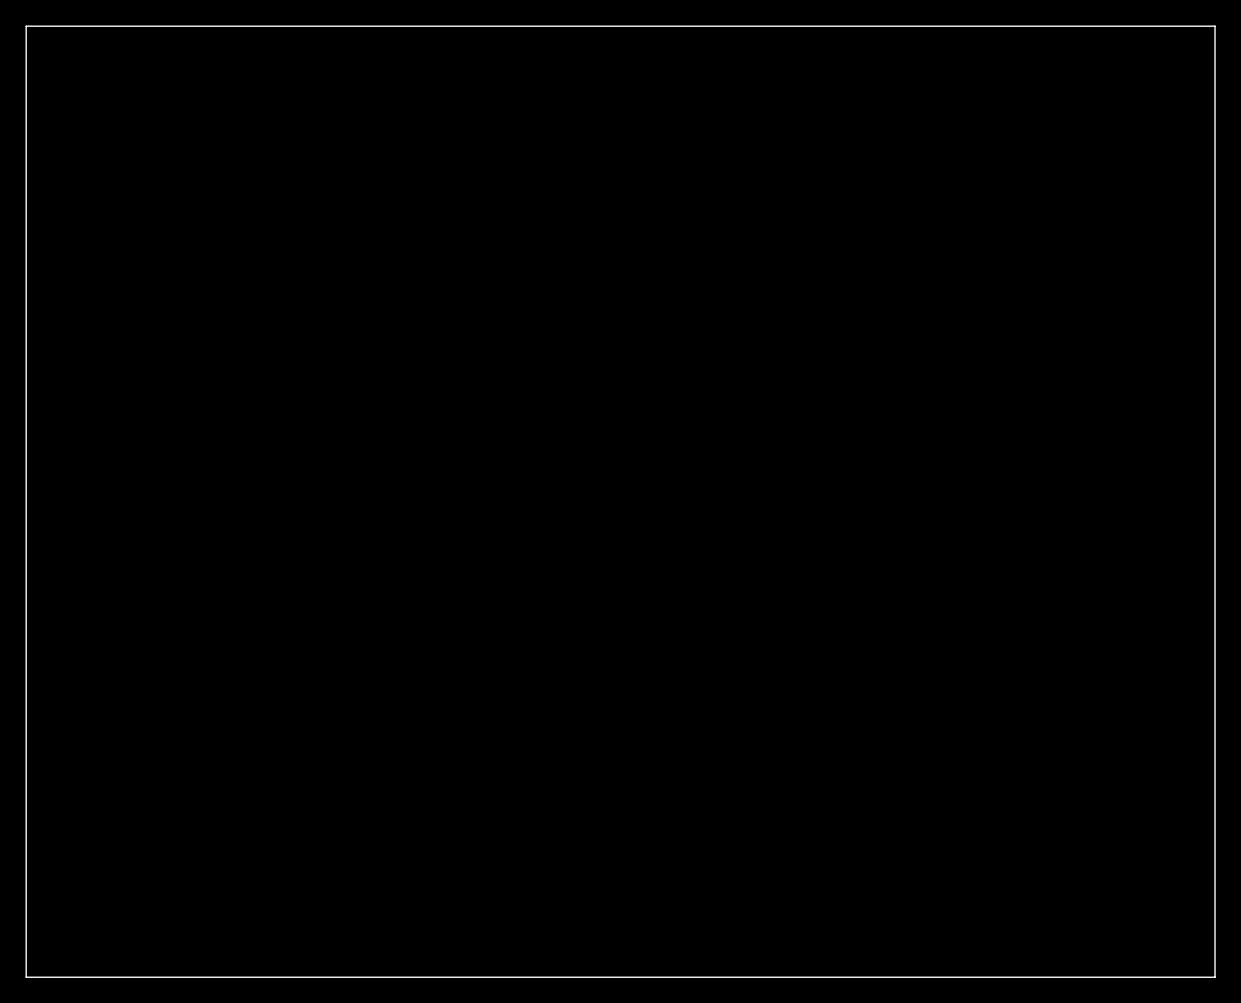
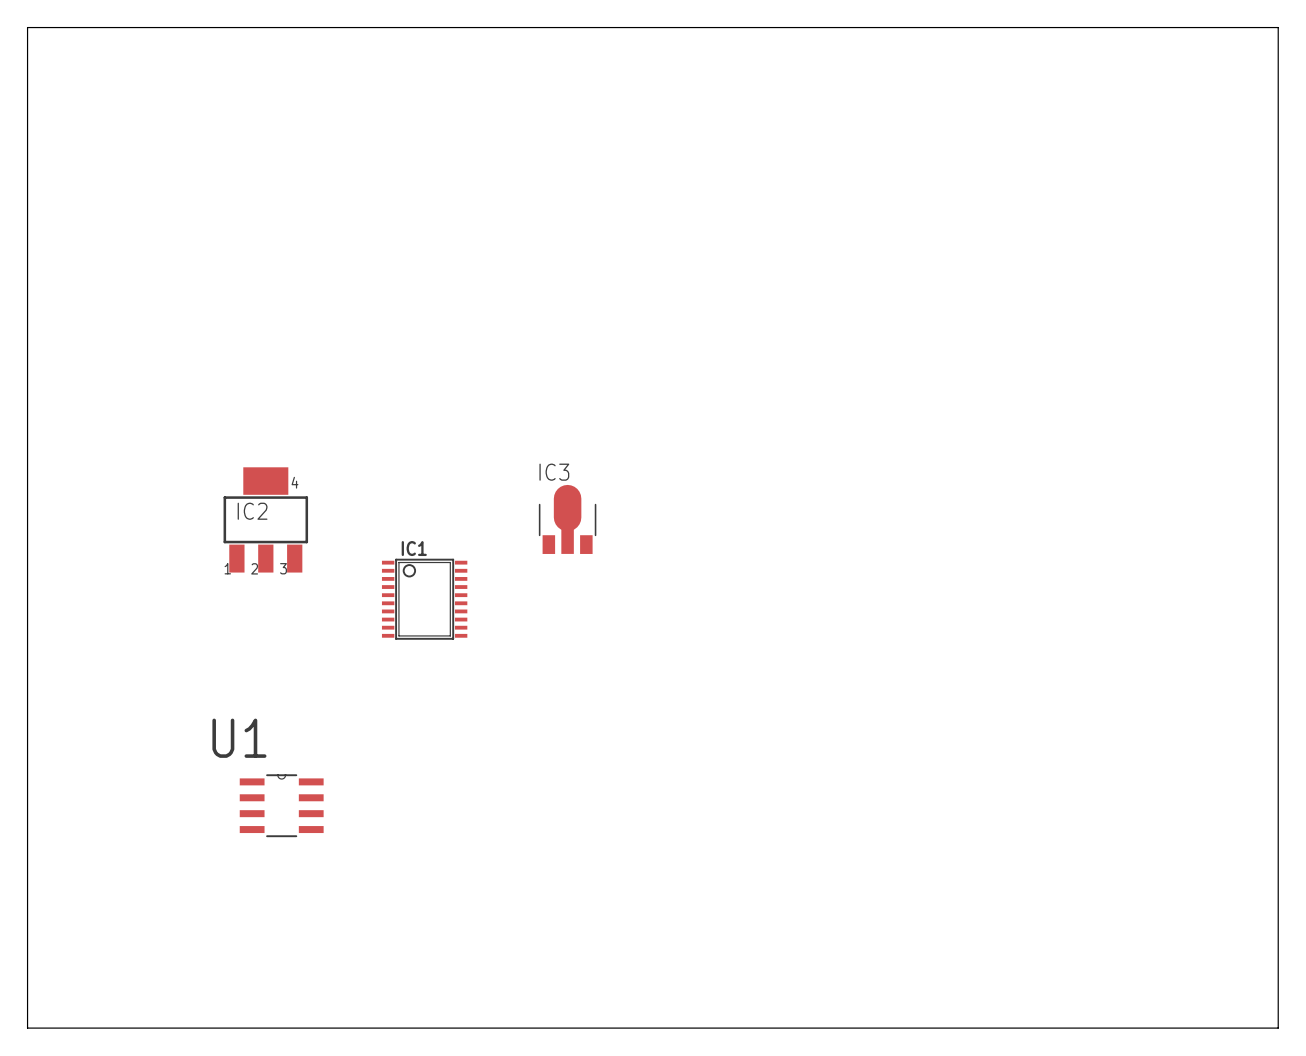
IC3: none -> (567, 519)
IC2: none -> (265, 519)
IC1: none -> (424, 599)
U1: none -> (281, 805)

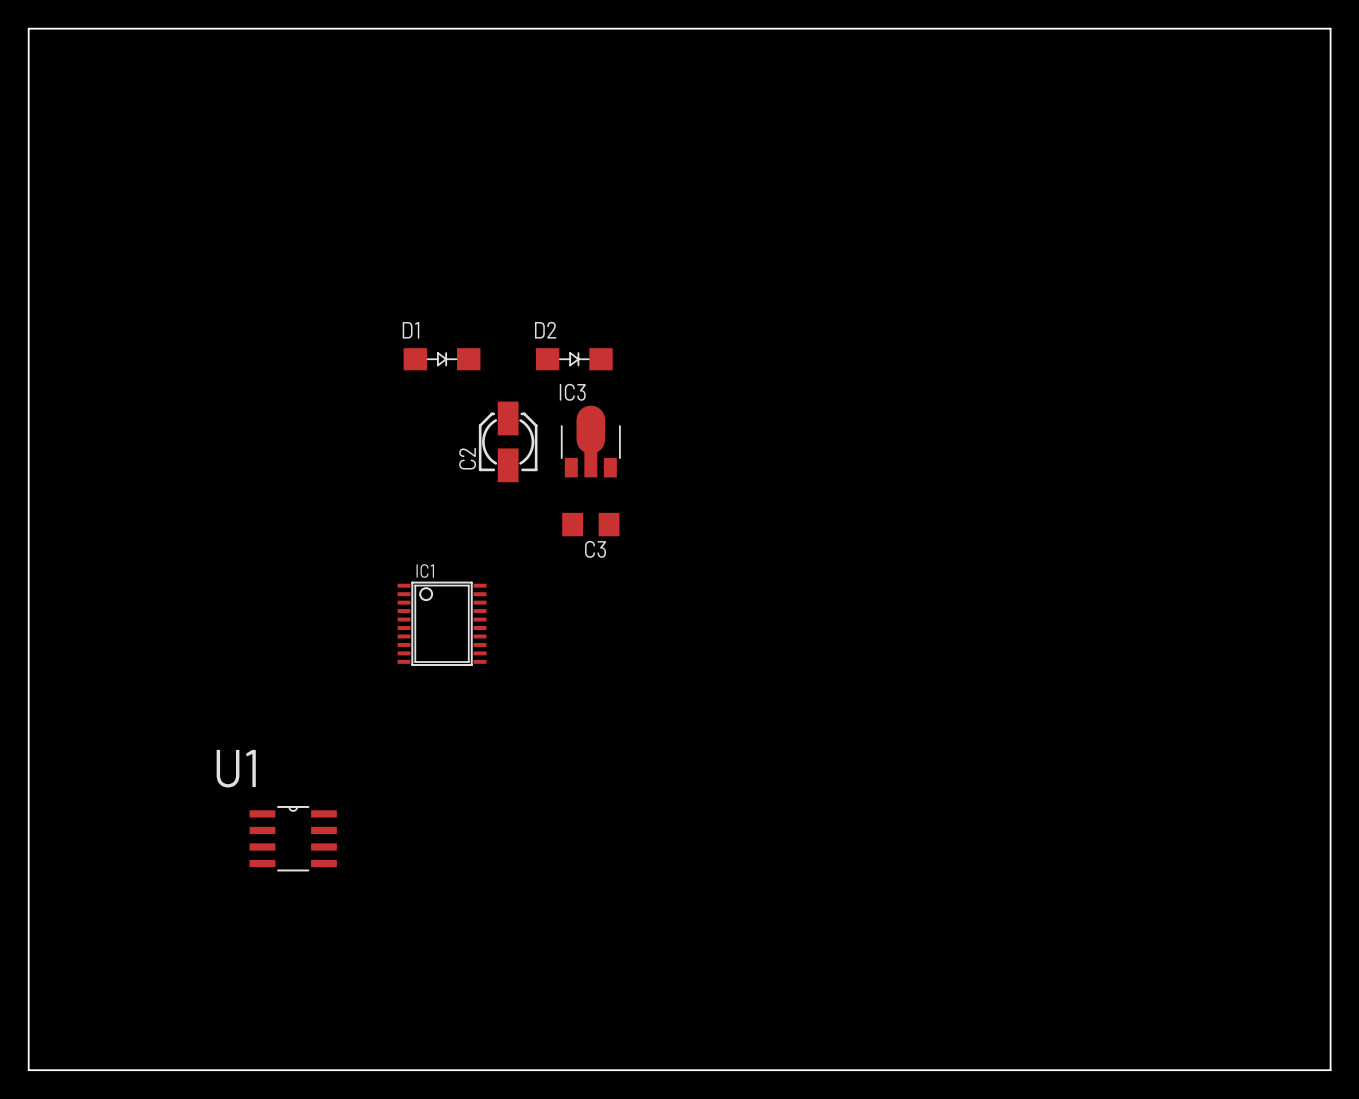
D1: none -> (442, 359)
D2: none -> (574, 359)
C2: none -> (508, 441)
C3: none -> (590, 524)
IC2: (265, 519) -> none
IC3 position: (567, 519) -> (590, 441)

